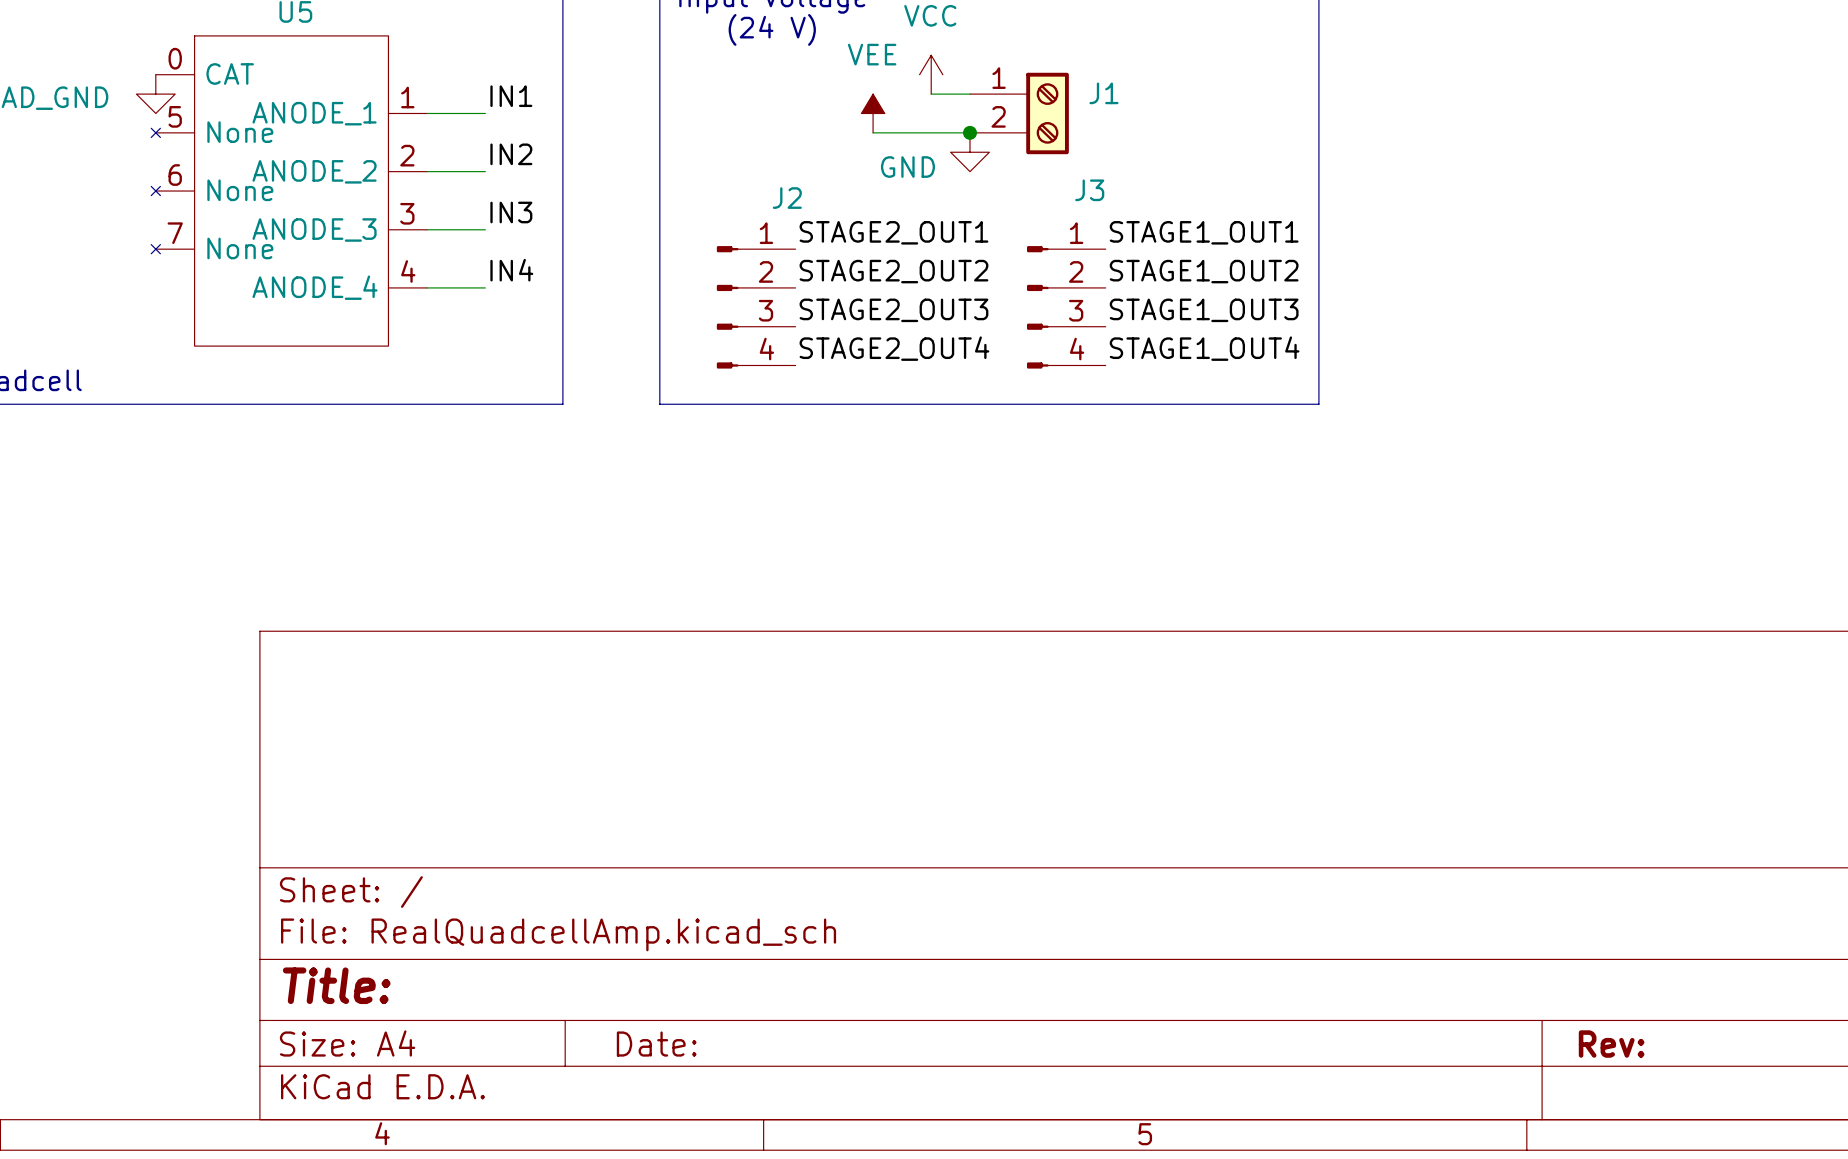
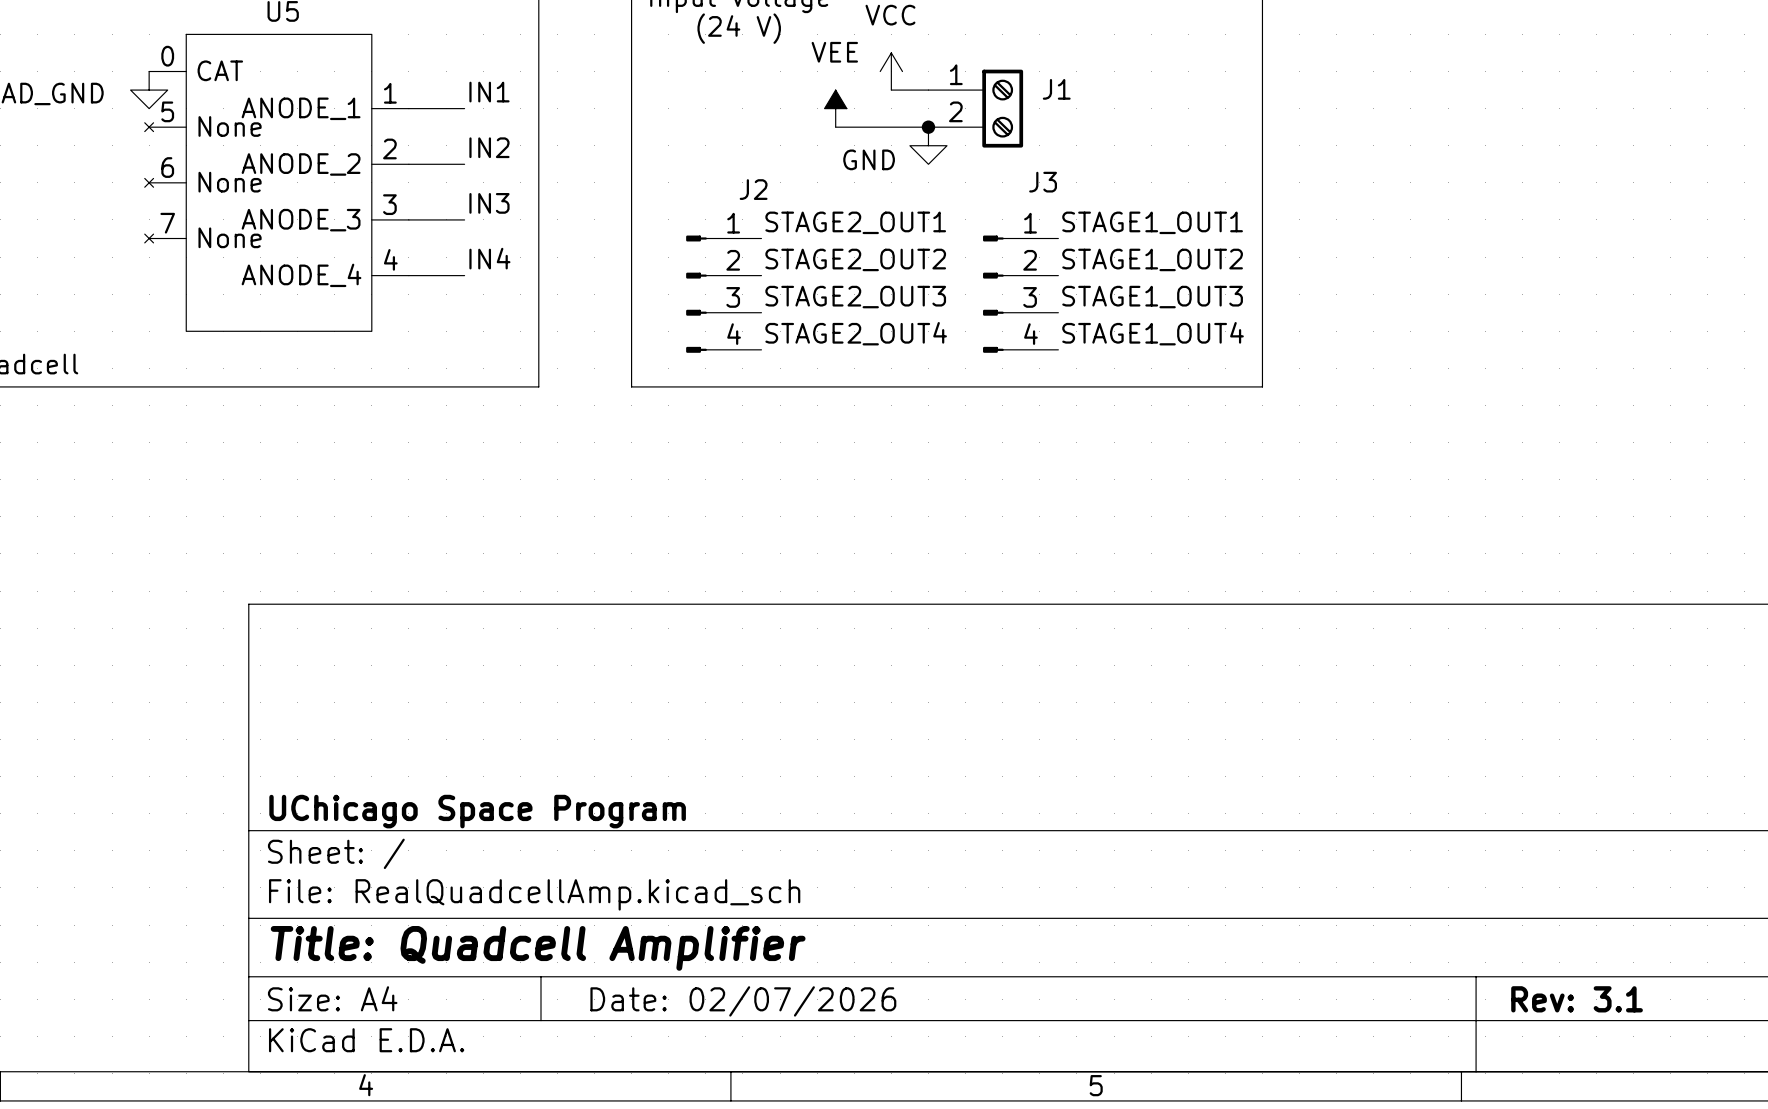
title block: none -> UChicago Space Program (477, 811)
title block: Title: (336, 985) -> Title: Quadcell Amplifier (538, 948)
title block: Date: (656, 1044) -> Date: 02/07/2026 (743, 1001)
title block: Rev: (1611, 1044) -> Rev: 3.1 (1577, 999)

